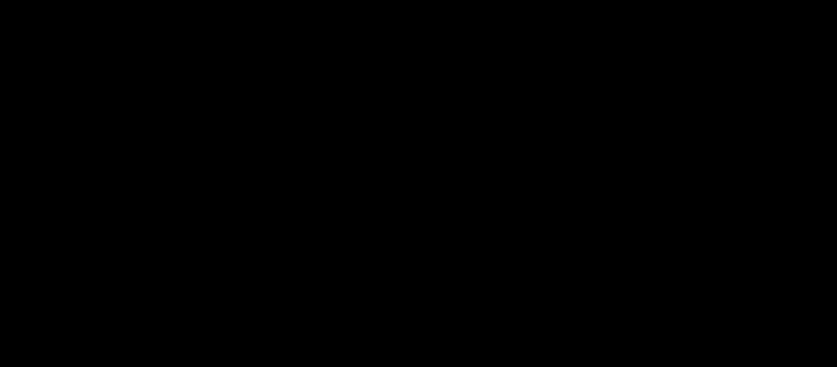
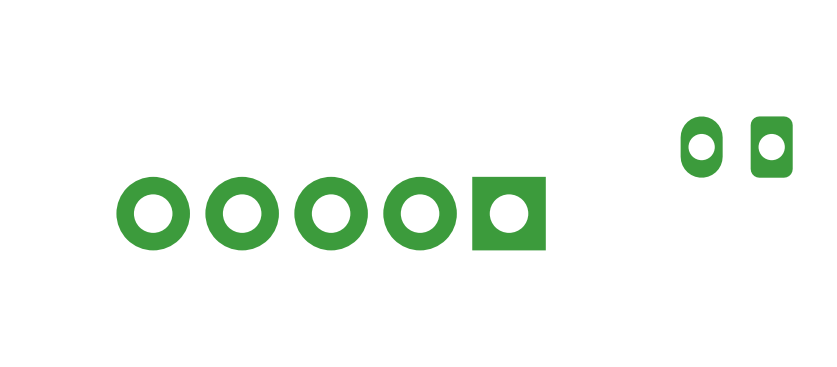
part: none -> (736, 147)
part: none -> (331, 213)

